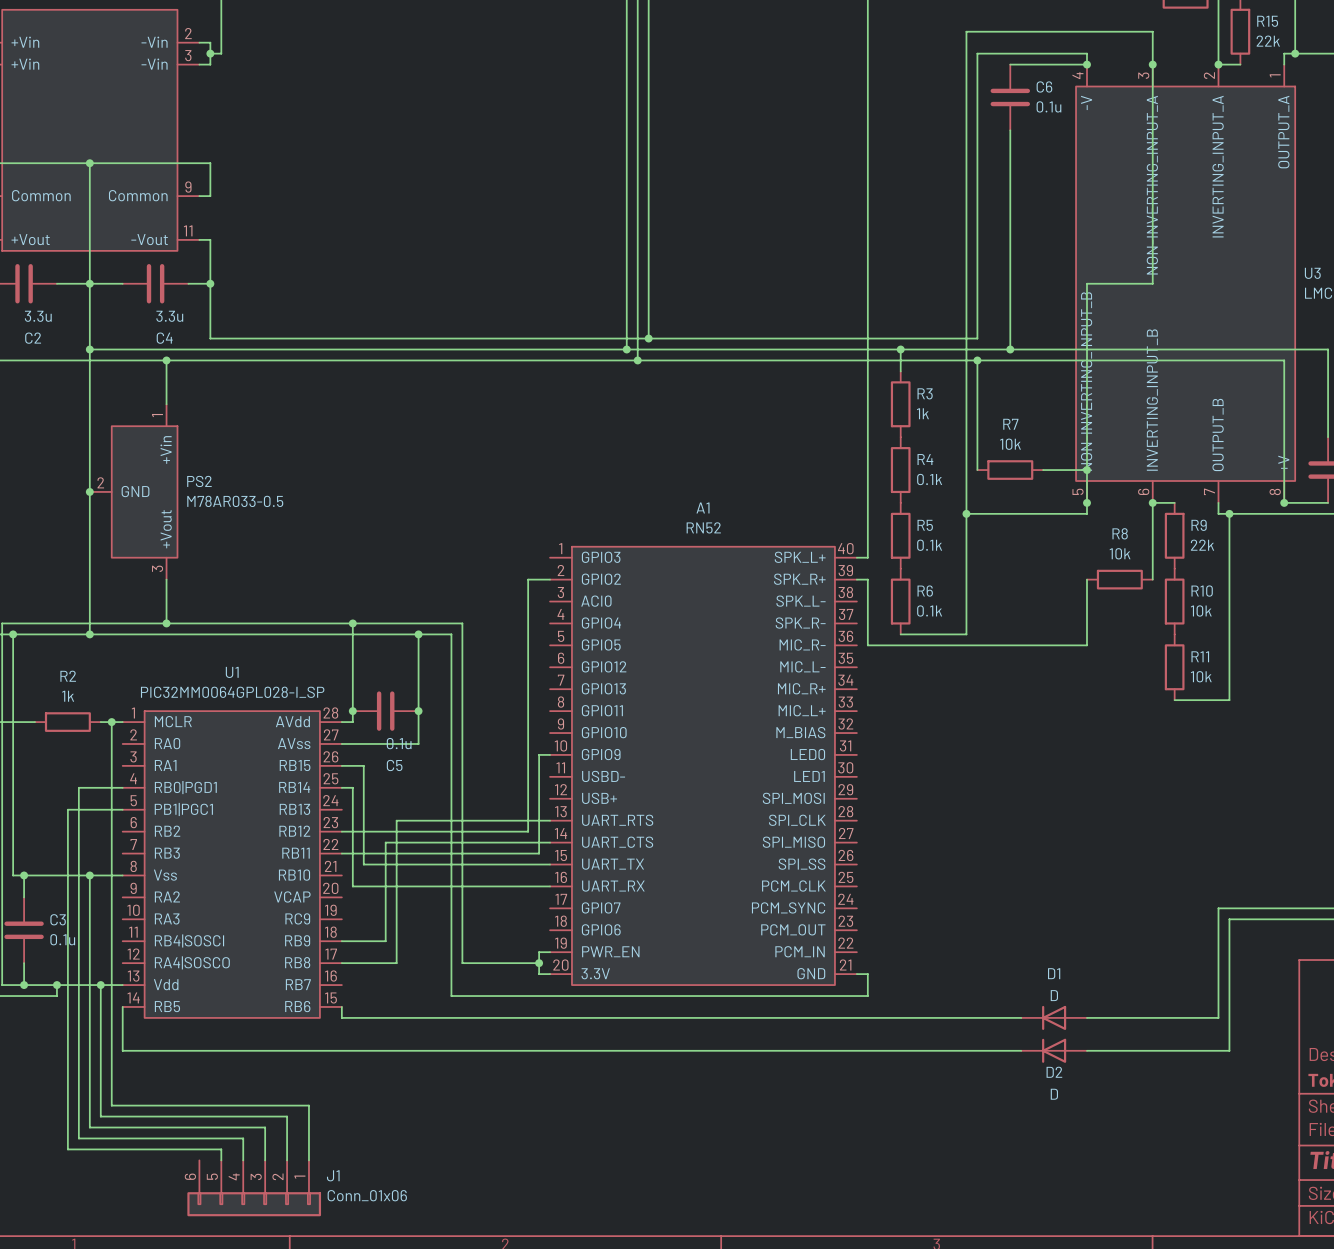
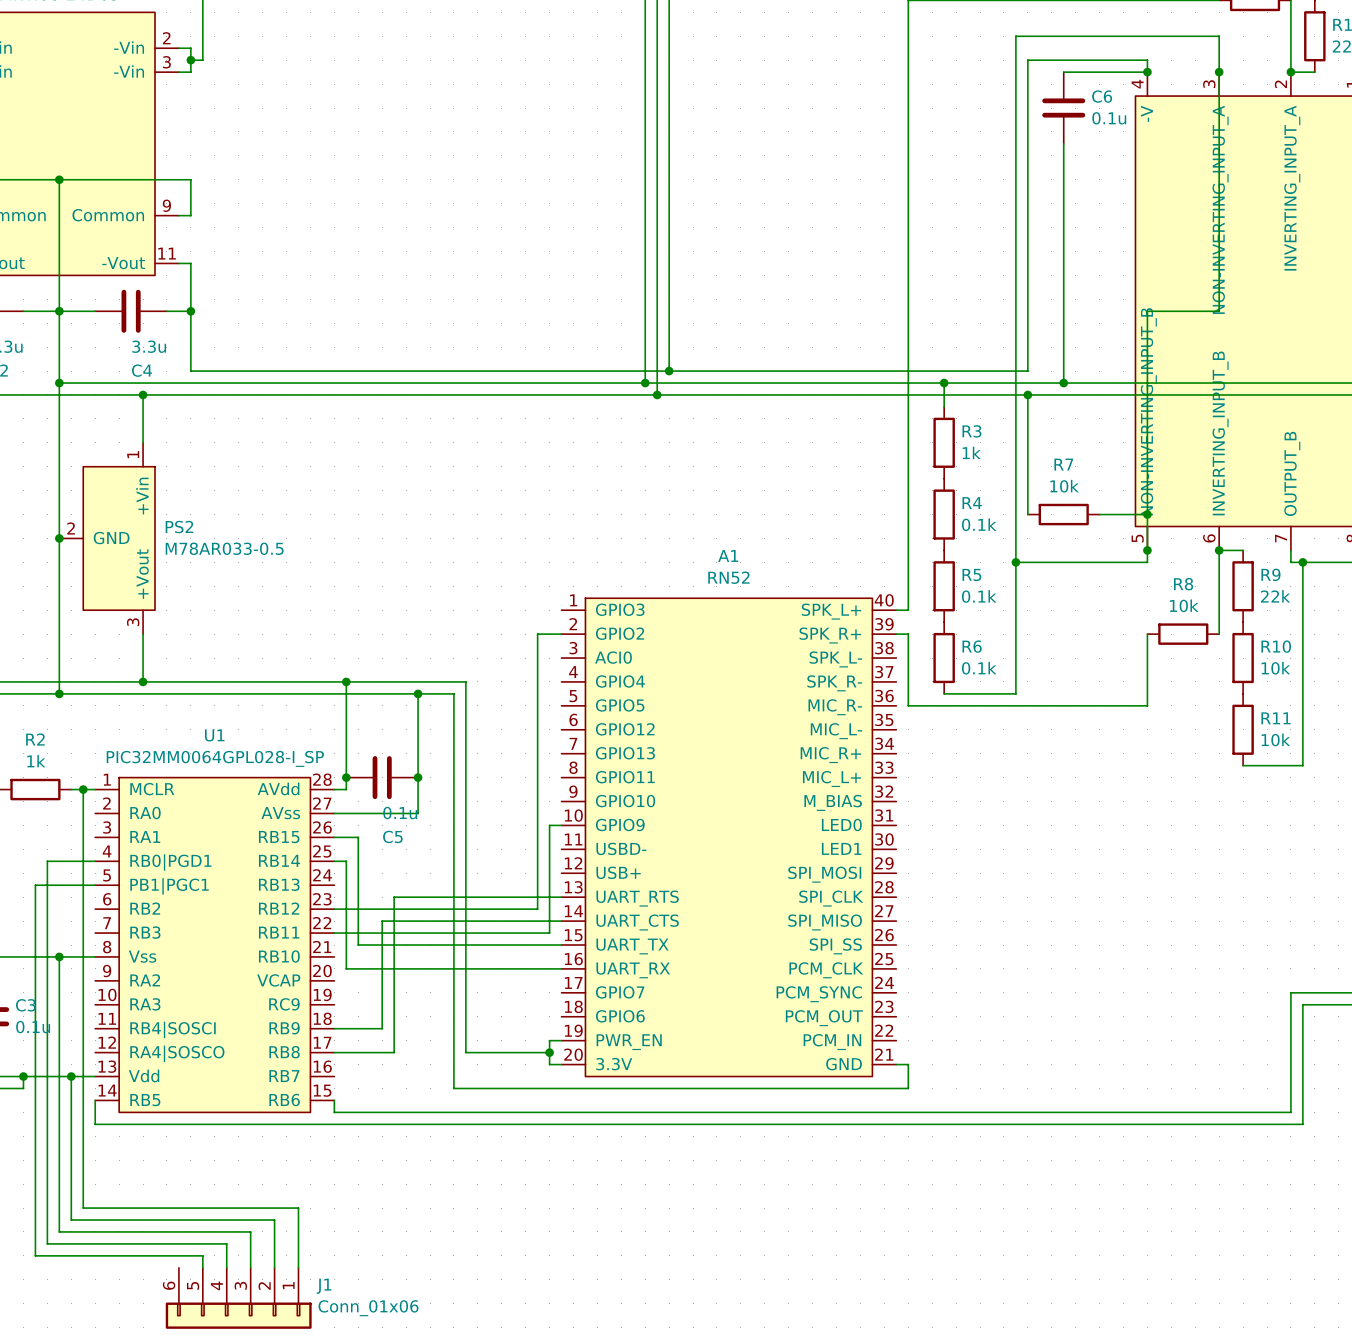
D1: D (1054, 1017) -> none
wire: (122, 1028) (122, 1050) (1021, 1050) -> (95, 1124) (1302, 1124)
wire: (1229, 1028) (1229, 1050) (1086, 1050) -> none
D2: D (1054, 1050) -> none

